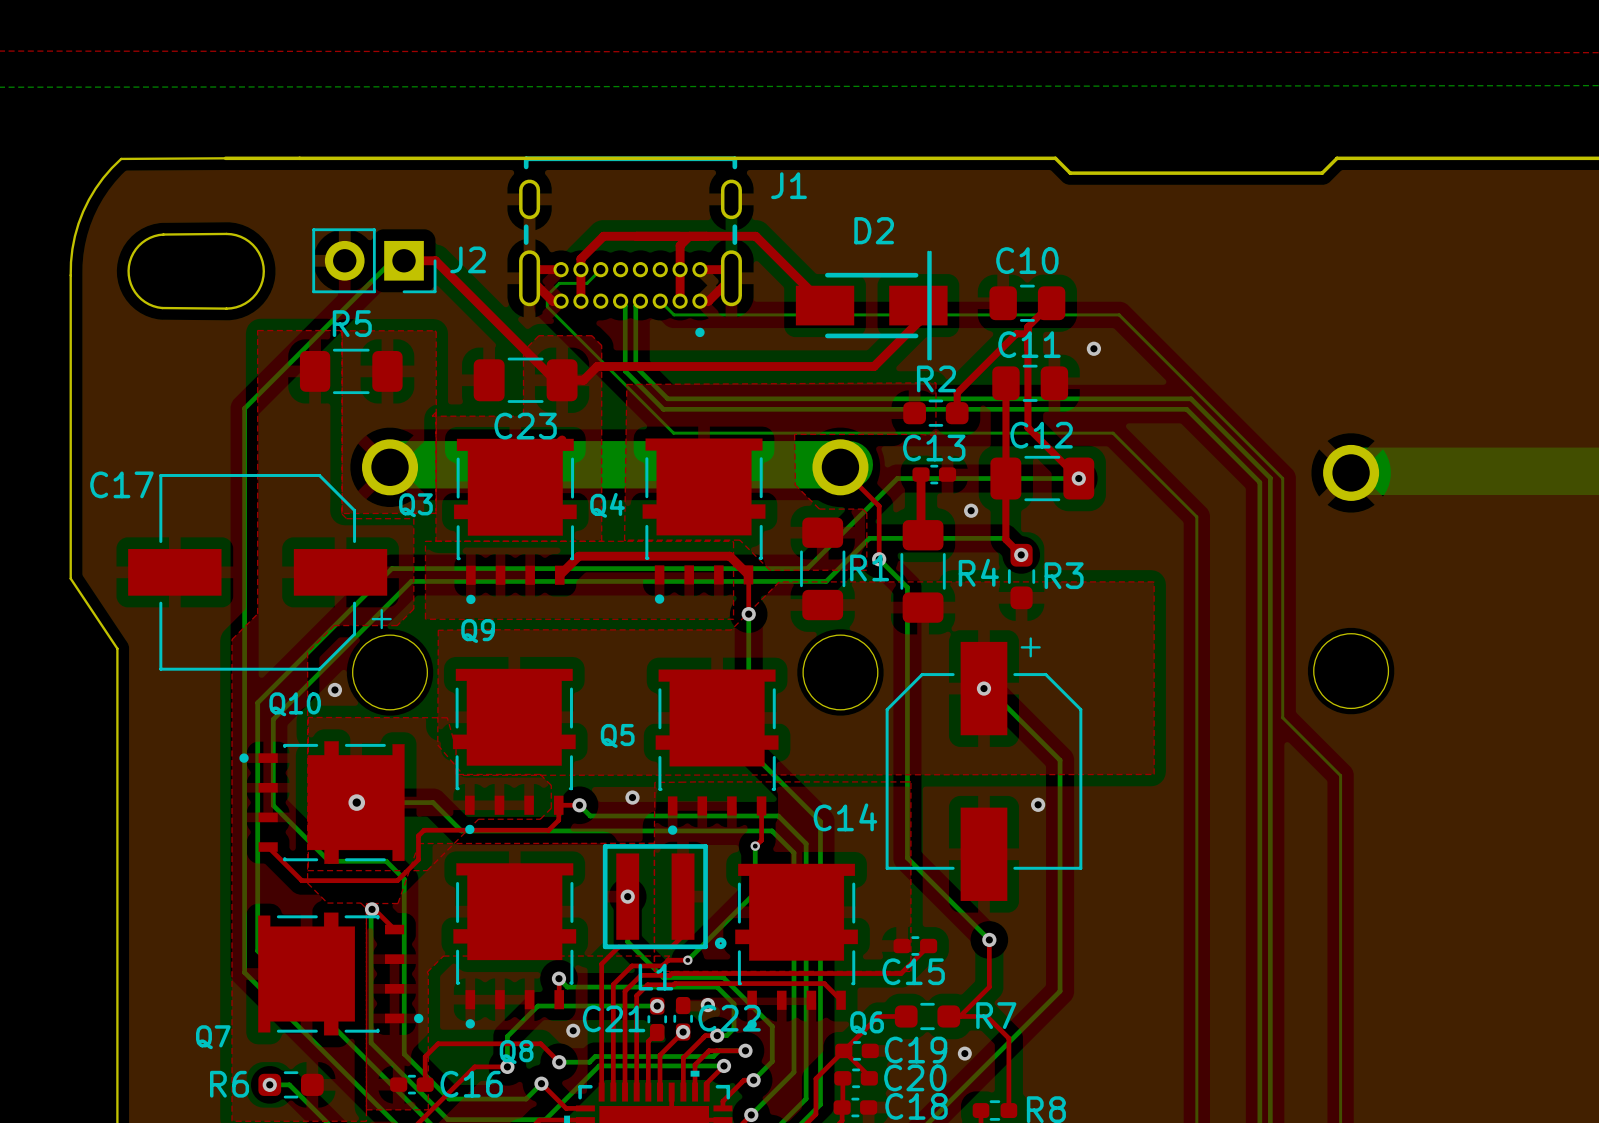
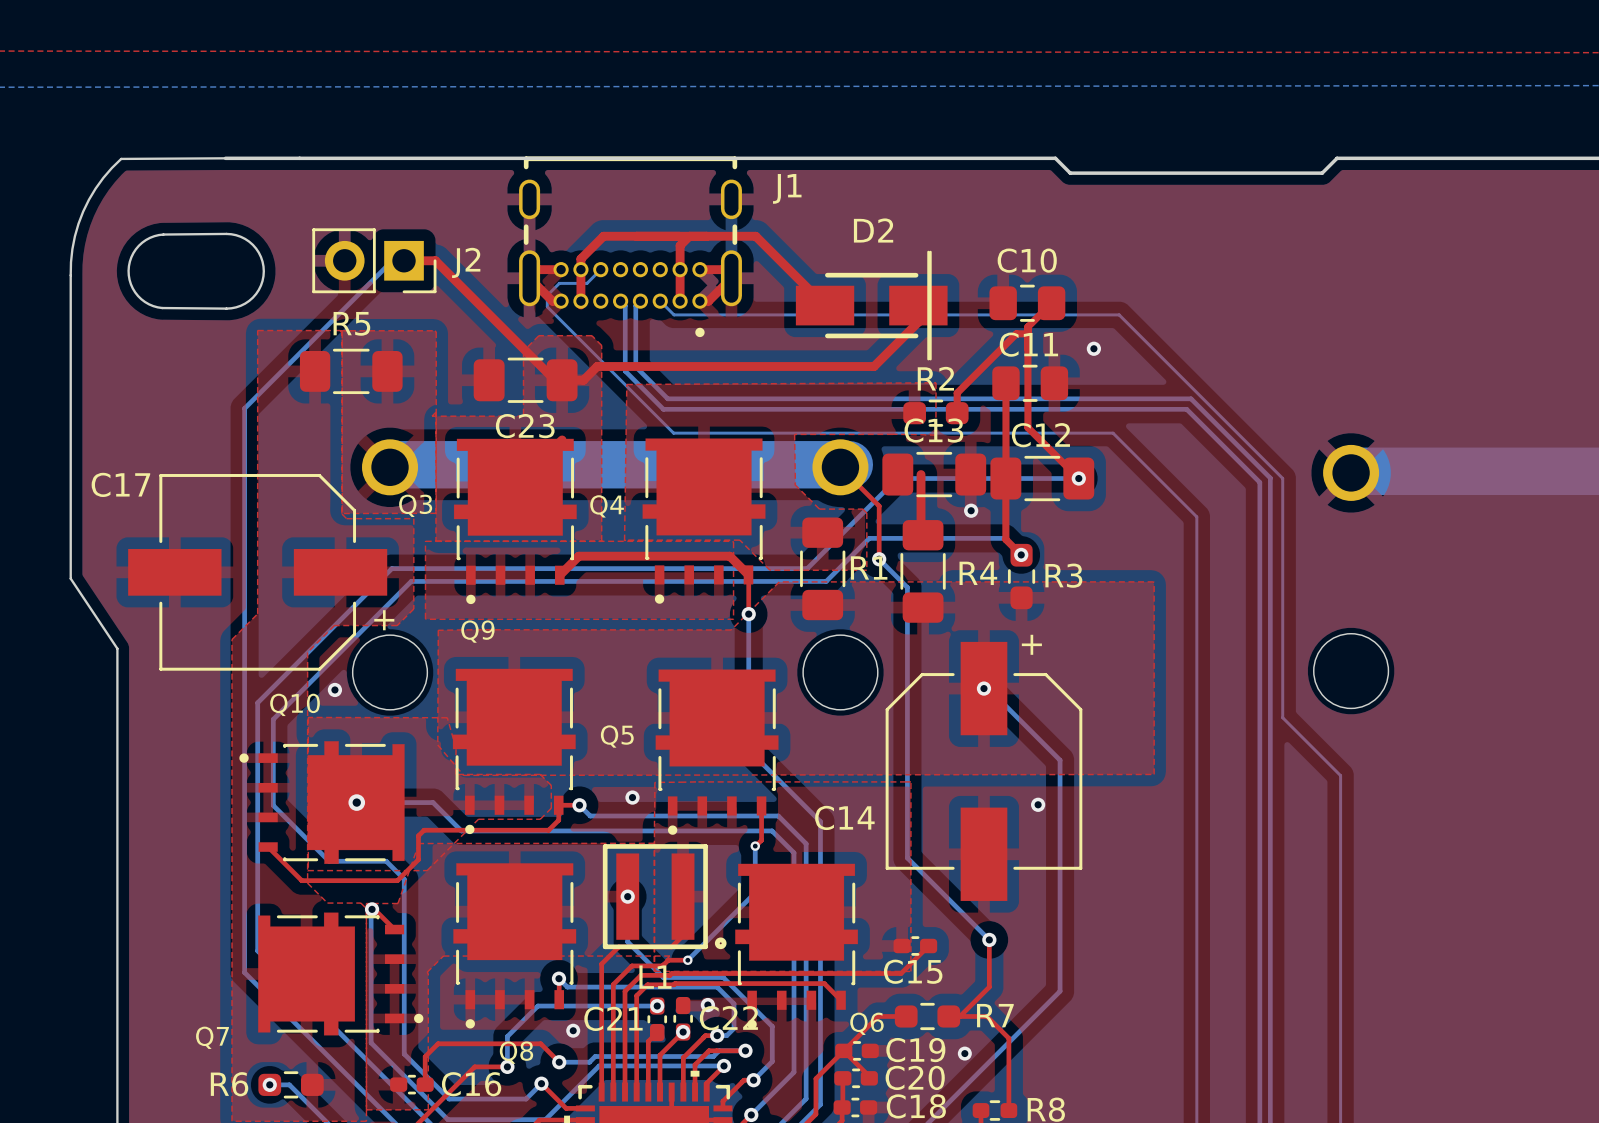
C13 footprint: [912, 464, 957, 485] -> [882, 451, 987, 498]

